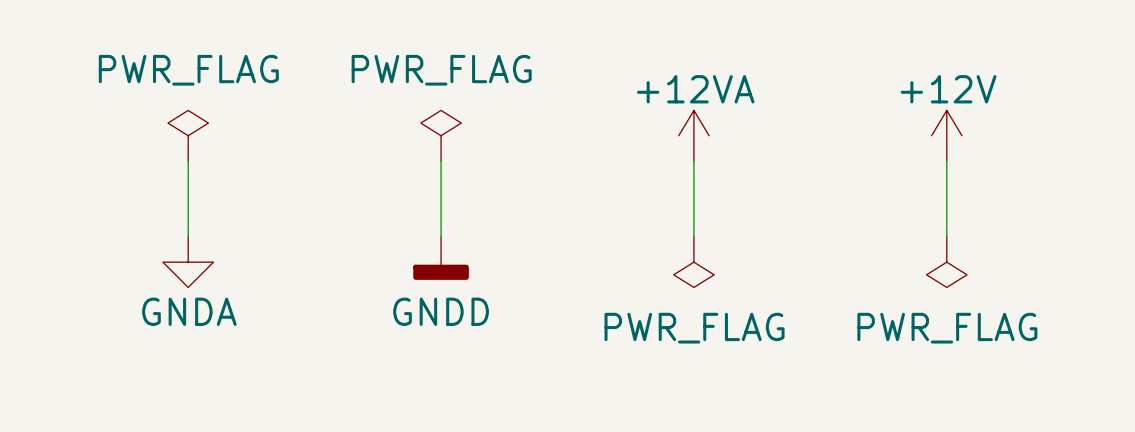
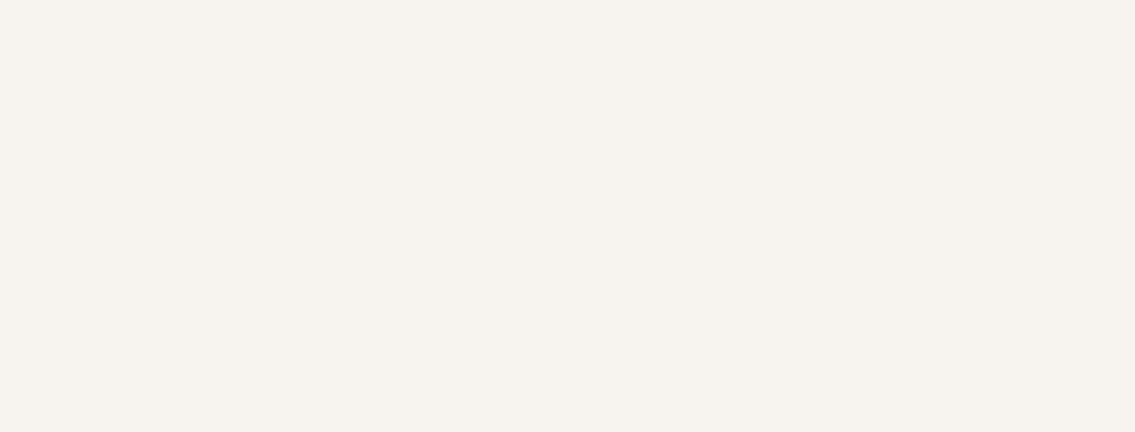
power symbol: PWR_FLAG (188, 135) -> none
power symbol: PWR_FLAG (441, 135) -> none
power symbol: +12VA (693, 135) -> none
power symbol: +12V (946, 135) -> none
wire: (188, 161) (188, 236) -> none
wire: (441, 161) (441, 236) -> none
wire: (693, 161) (693, 236) -> none
wire: (946, 161) (946, 236) -> none
power symbol: GNDD (441, 258) -> none
power symbol: GNDA (188, 262) -> none
power symbol: PWR_FLAG (693, 262) -> none
power symbol: PWR_FLAG (946, 262) -> none

